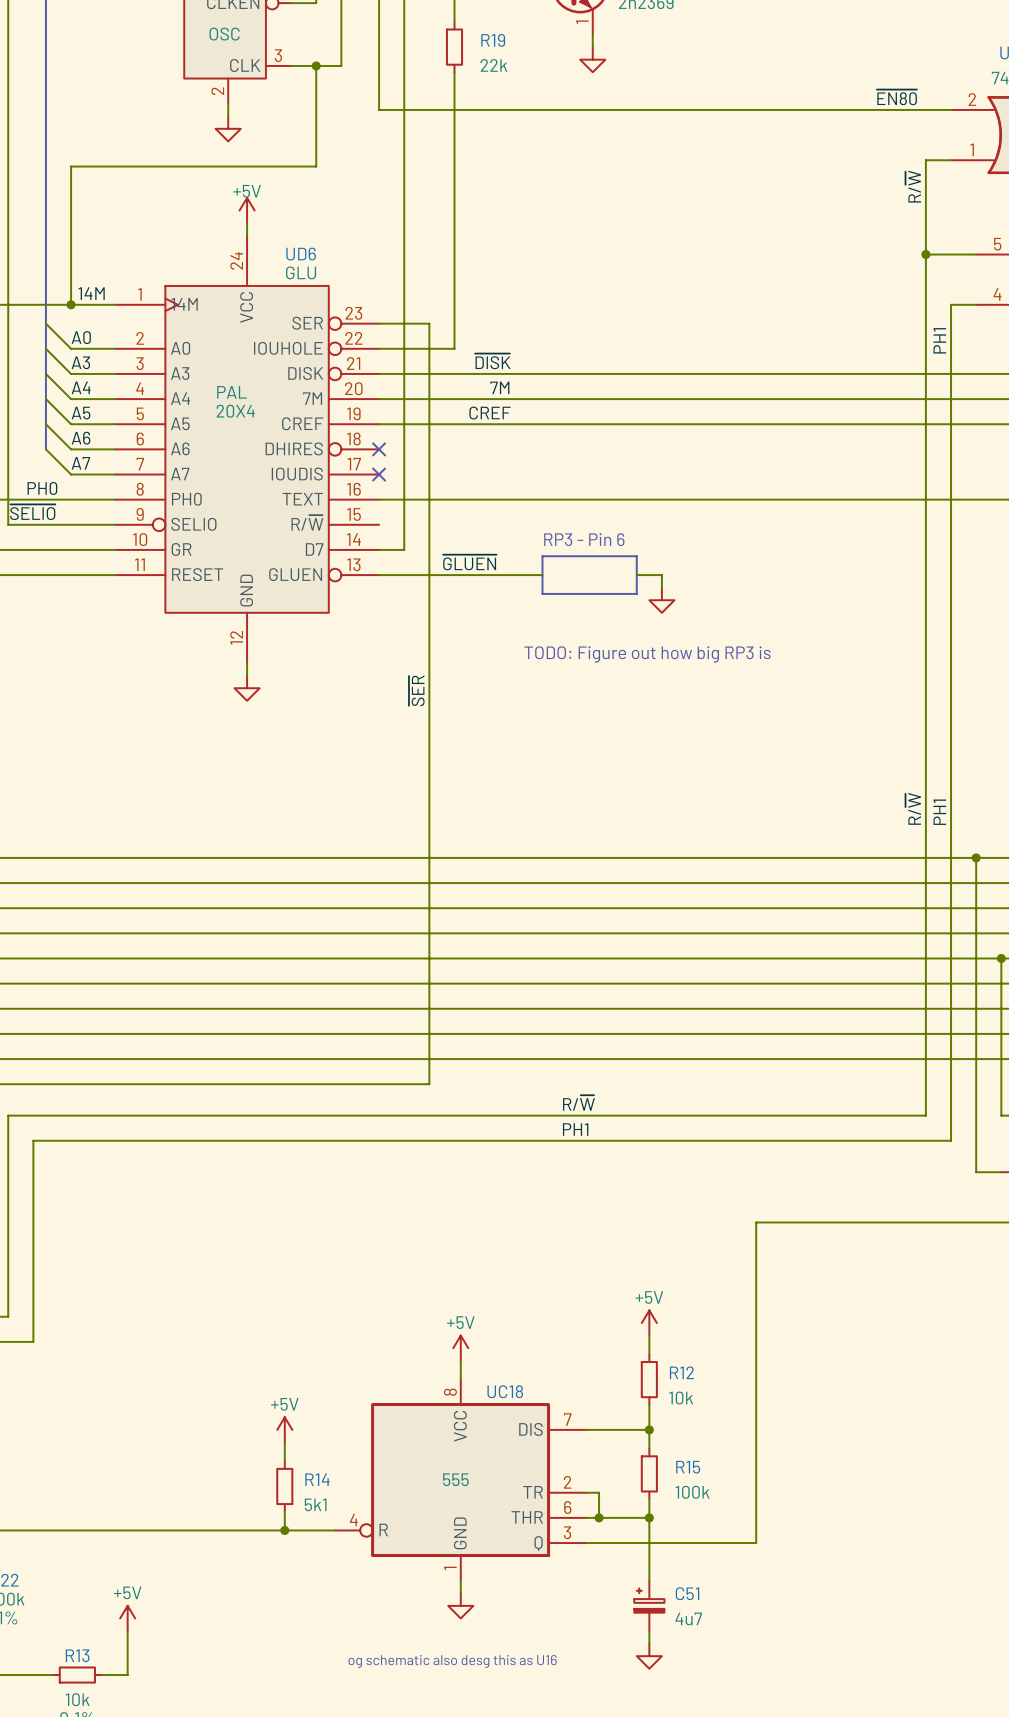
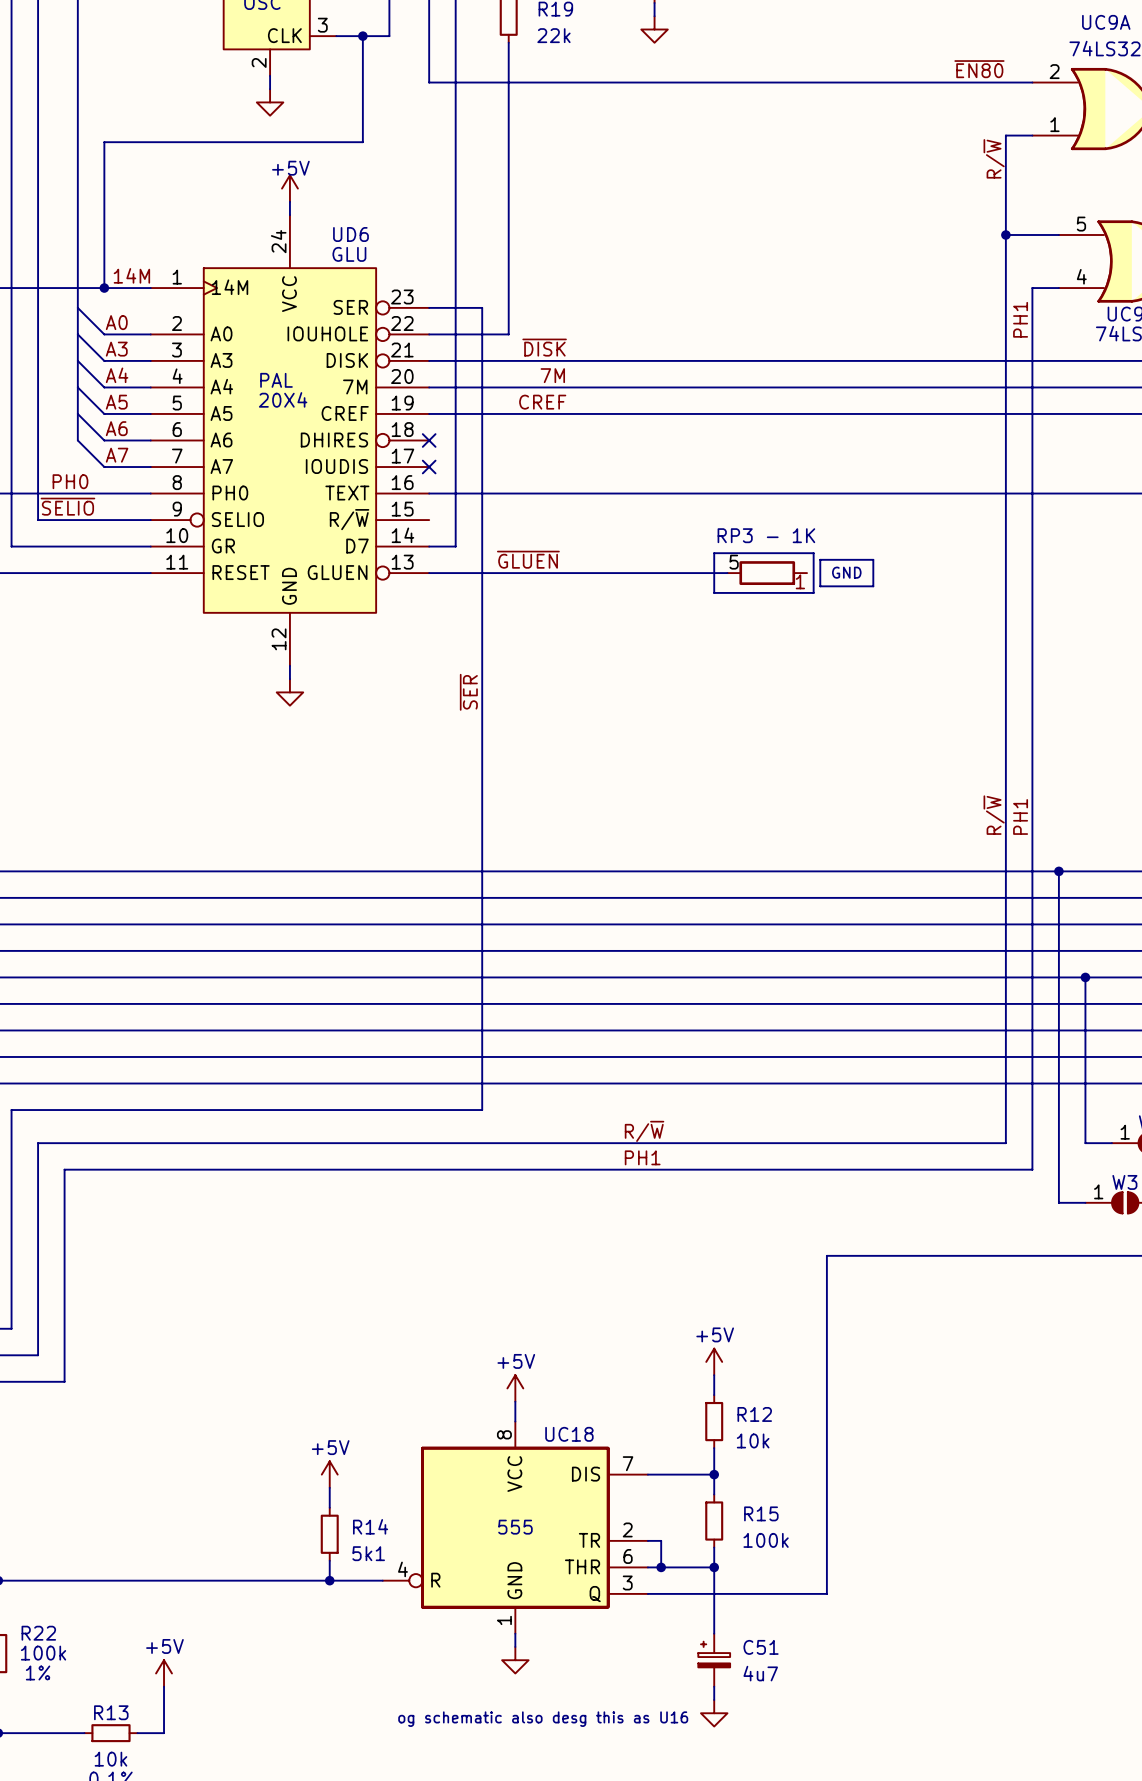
text: RP3 - Pin 6 (584, 539) -> RP3 - 1K (766, 535)
line: (542, 556) (636, 556) (636, 593) (542, 593) (542, 556) -> (714, 553) (813, 553) (813, 592) (714, 592) (714, 553)
line: none -> (820, 559) (873, 559) (873, 586) (820, 586) (820, 559)
text: none -> GND (846, 572)
wire: none -> (601, 573) (700, 573)
wire: (661, 575) (661, 587) -> none
part: none -> (767, 573)
power symbol: (661, 600) -> none
text: TODO: Figure out how big RP3 is (647, 654) -> none

